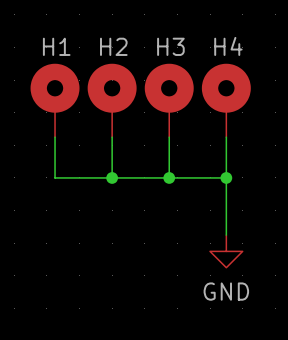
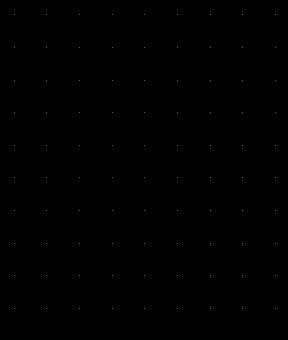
H1: (55, 100) -> none
H2: (112, 100) -> none
H3: (169, 100) -> none
H4: (226, 100) -> none
wire: (55, 137) (55, 177) (226, 177) -> none
wire: (112, 137) (112, 177) -> none
wire: (169, 137) (169, 177) -> none
wire: (226, 137) (226, 235) -> none
junction: (112, 177) -> none
junction: (169, 177) -> none
junction: (226, 177) -> none
power symbol: GND (226, 251) -> none

